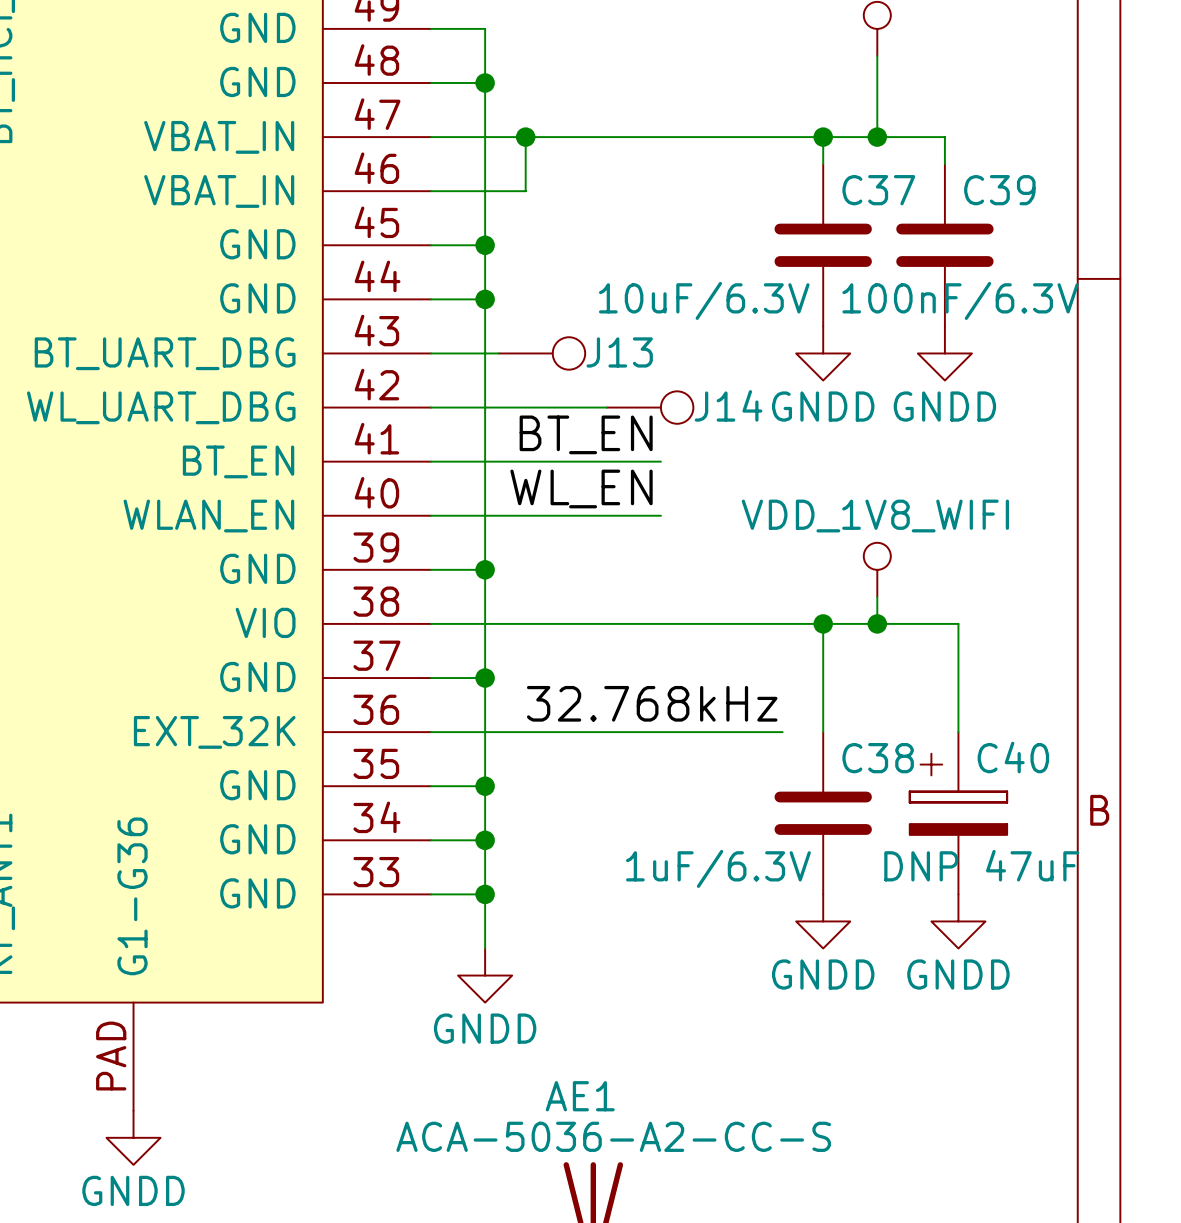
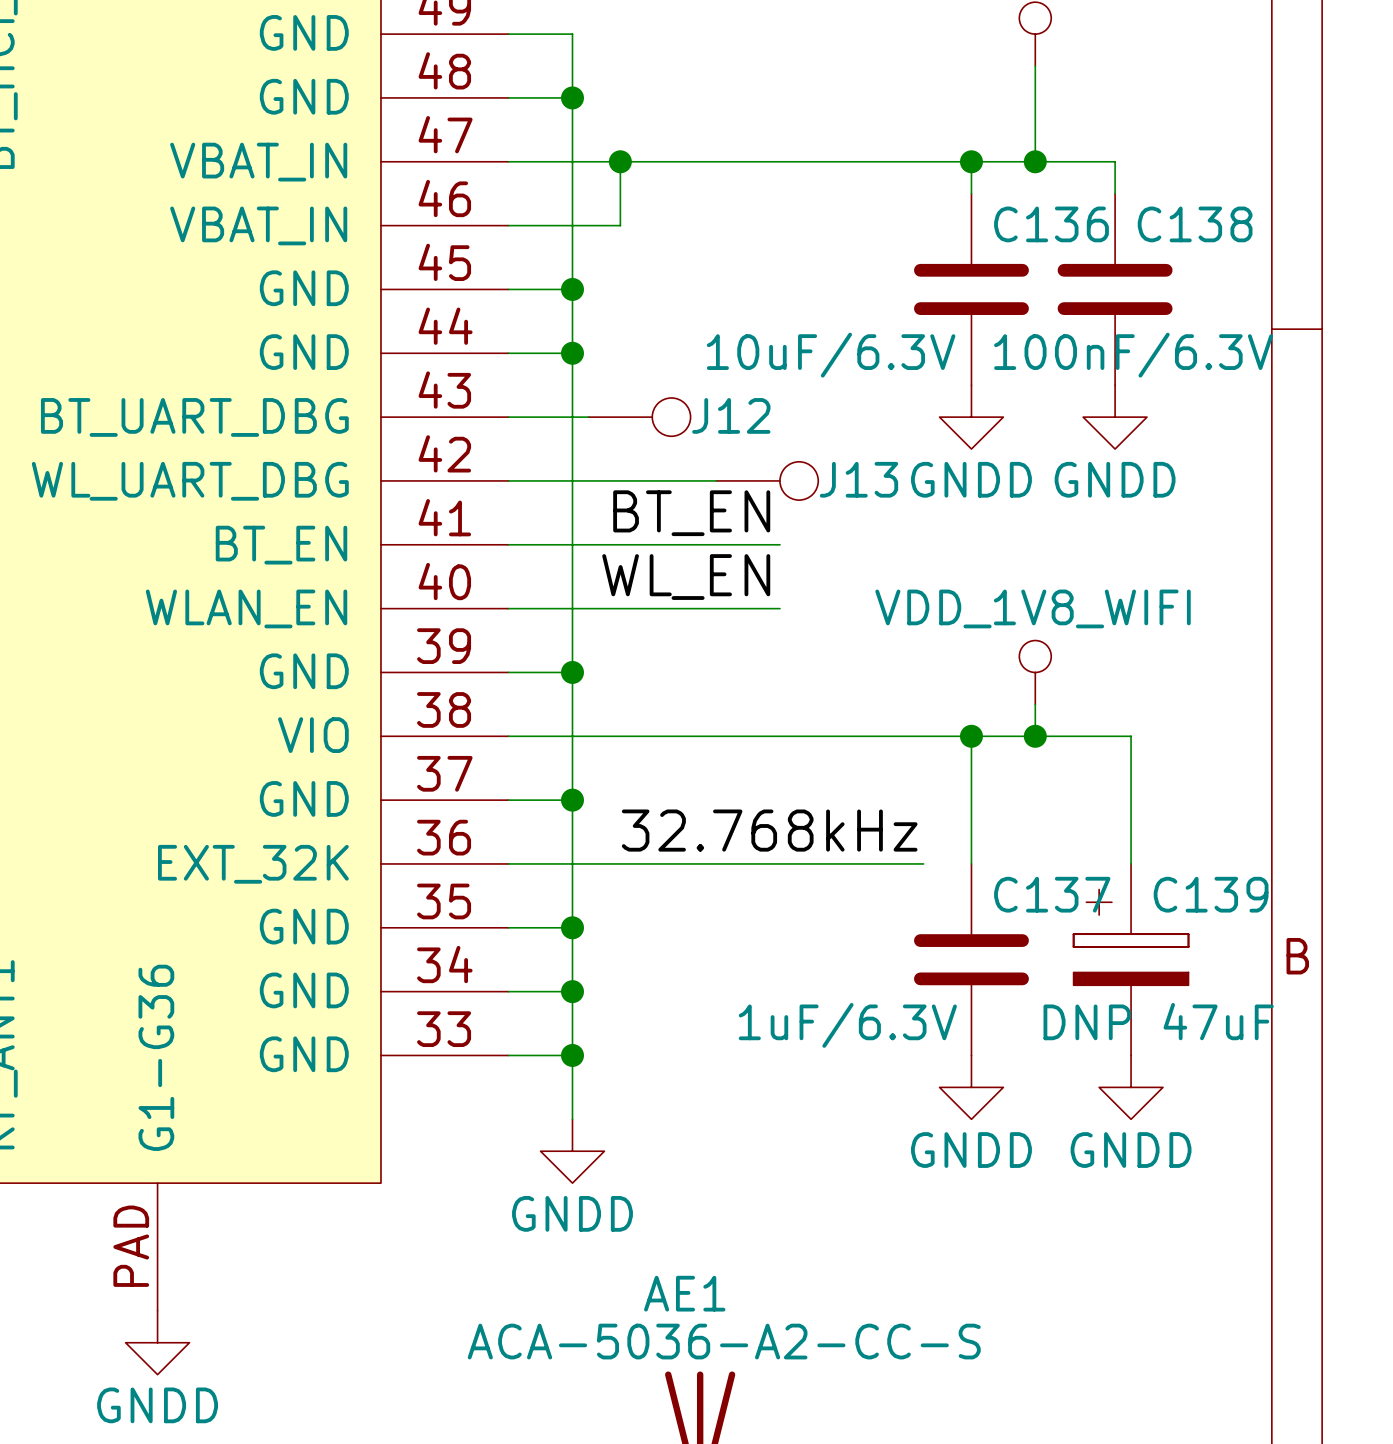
C37 name: C37 (878, 190) -> C136 (1051, 224)
C39 name: C39 (999, 190) -> C138 (1195, 224)
J13 name: J13 (619, 352) -> J12 (731, 415)
J14 name: J14 (728, 405) -> J13 (858, 479)
C40 name: C40 (1013, 757) -> C139 (1211, 894)
C38 name: C38 (878, 758) -> C137 (1052, 894)

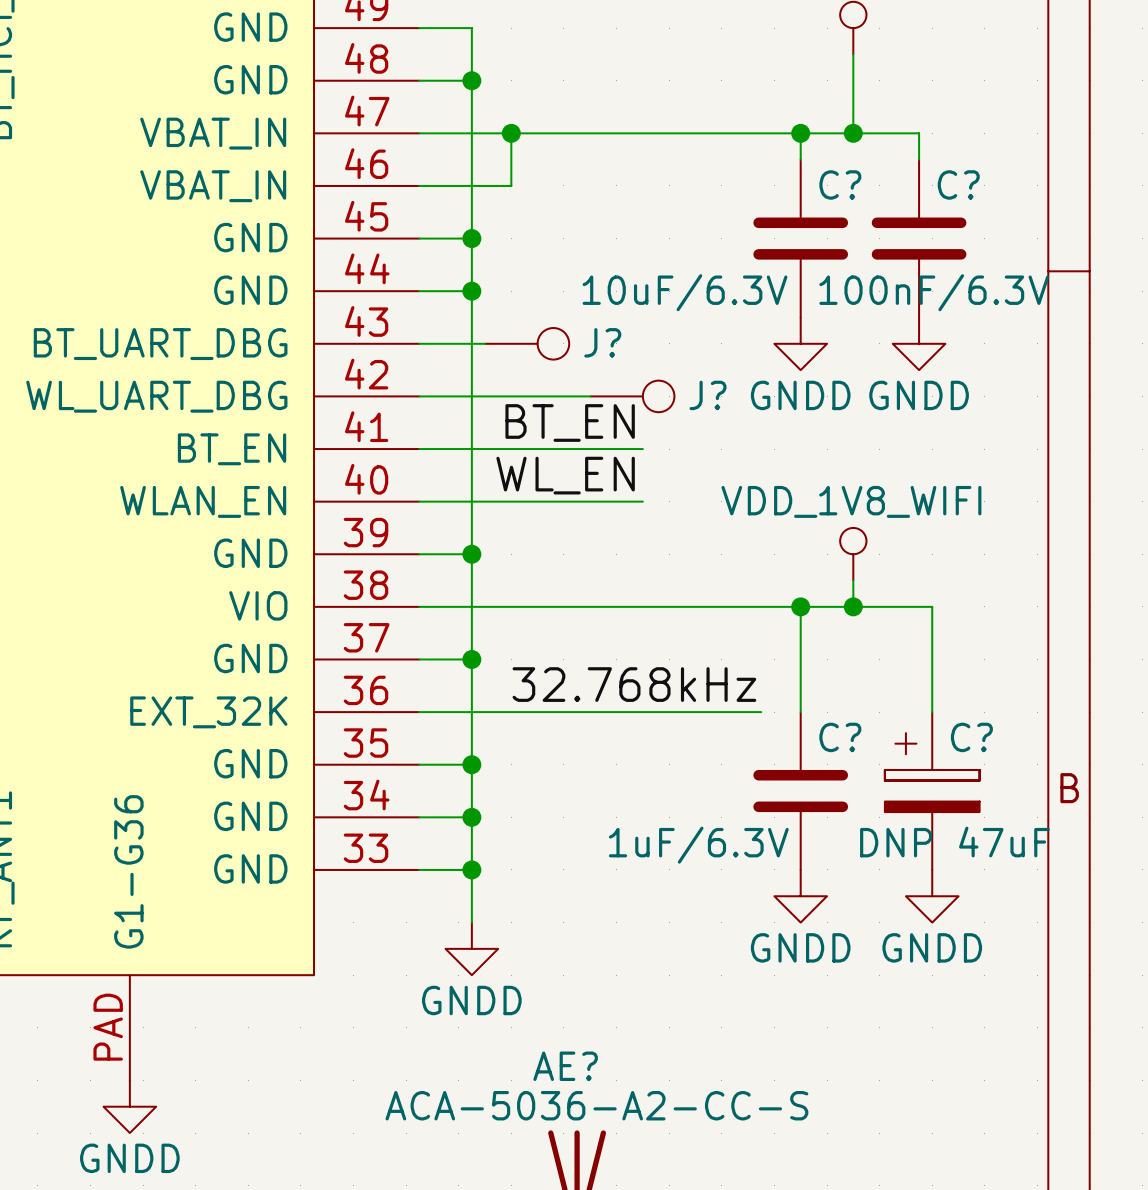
C136 name: C136 (1051, 224) -> C? (840, 184)
C138 name: C138 (1195, 224) -> C? (958, 184)
J12 name: J12 (731, 415) -> J? (602, 342)
J13 name: J13 (858, 479) -> J? (708, 395)
C137 name: C137 (1052, 894) -> C? (840, 737)
C139 name: C139 (1211, 894) -> C? (971, 737)
AE1 name: AE1 (684, 1293) -> AE? (565, 1066)

